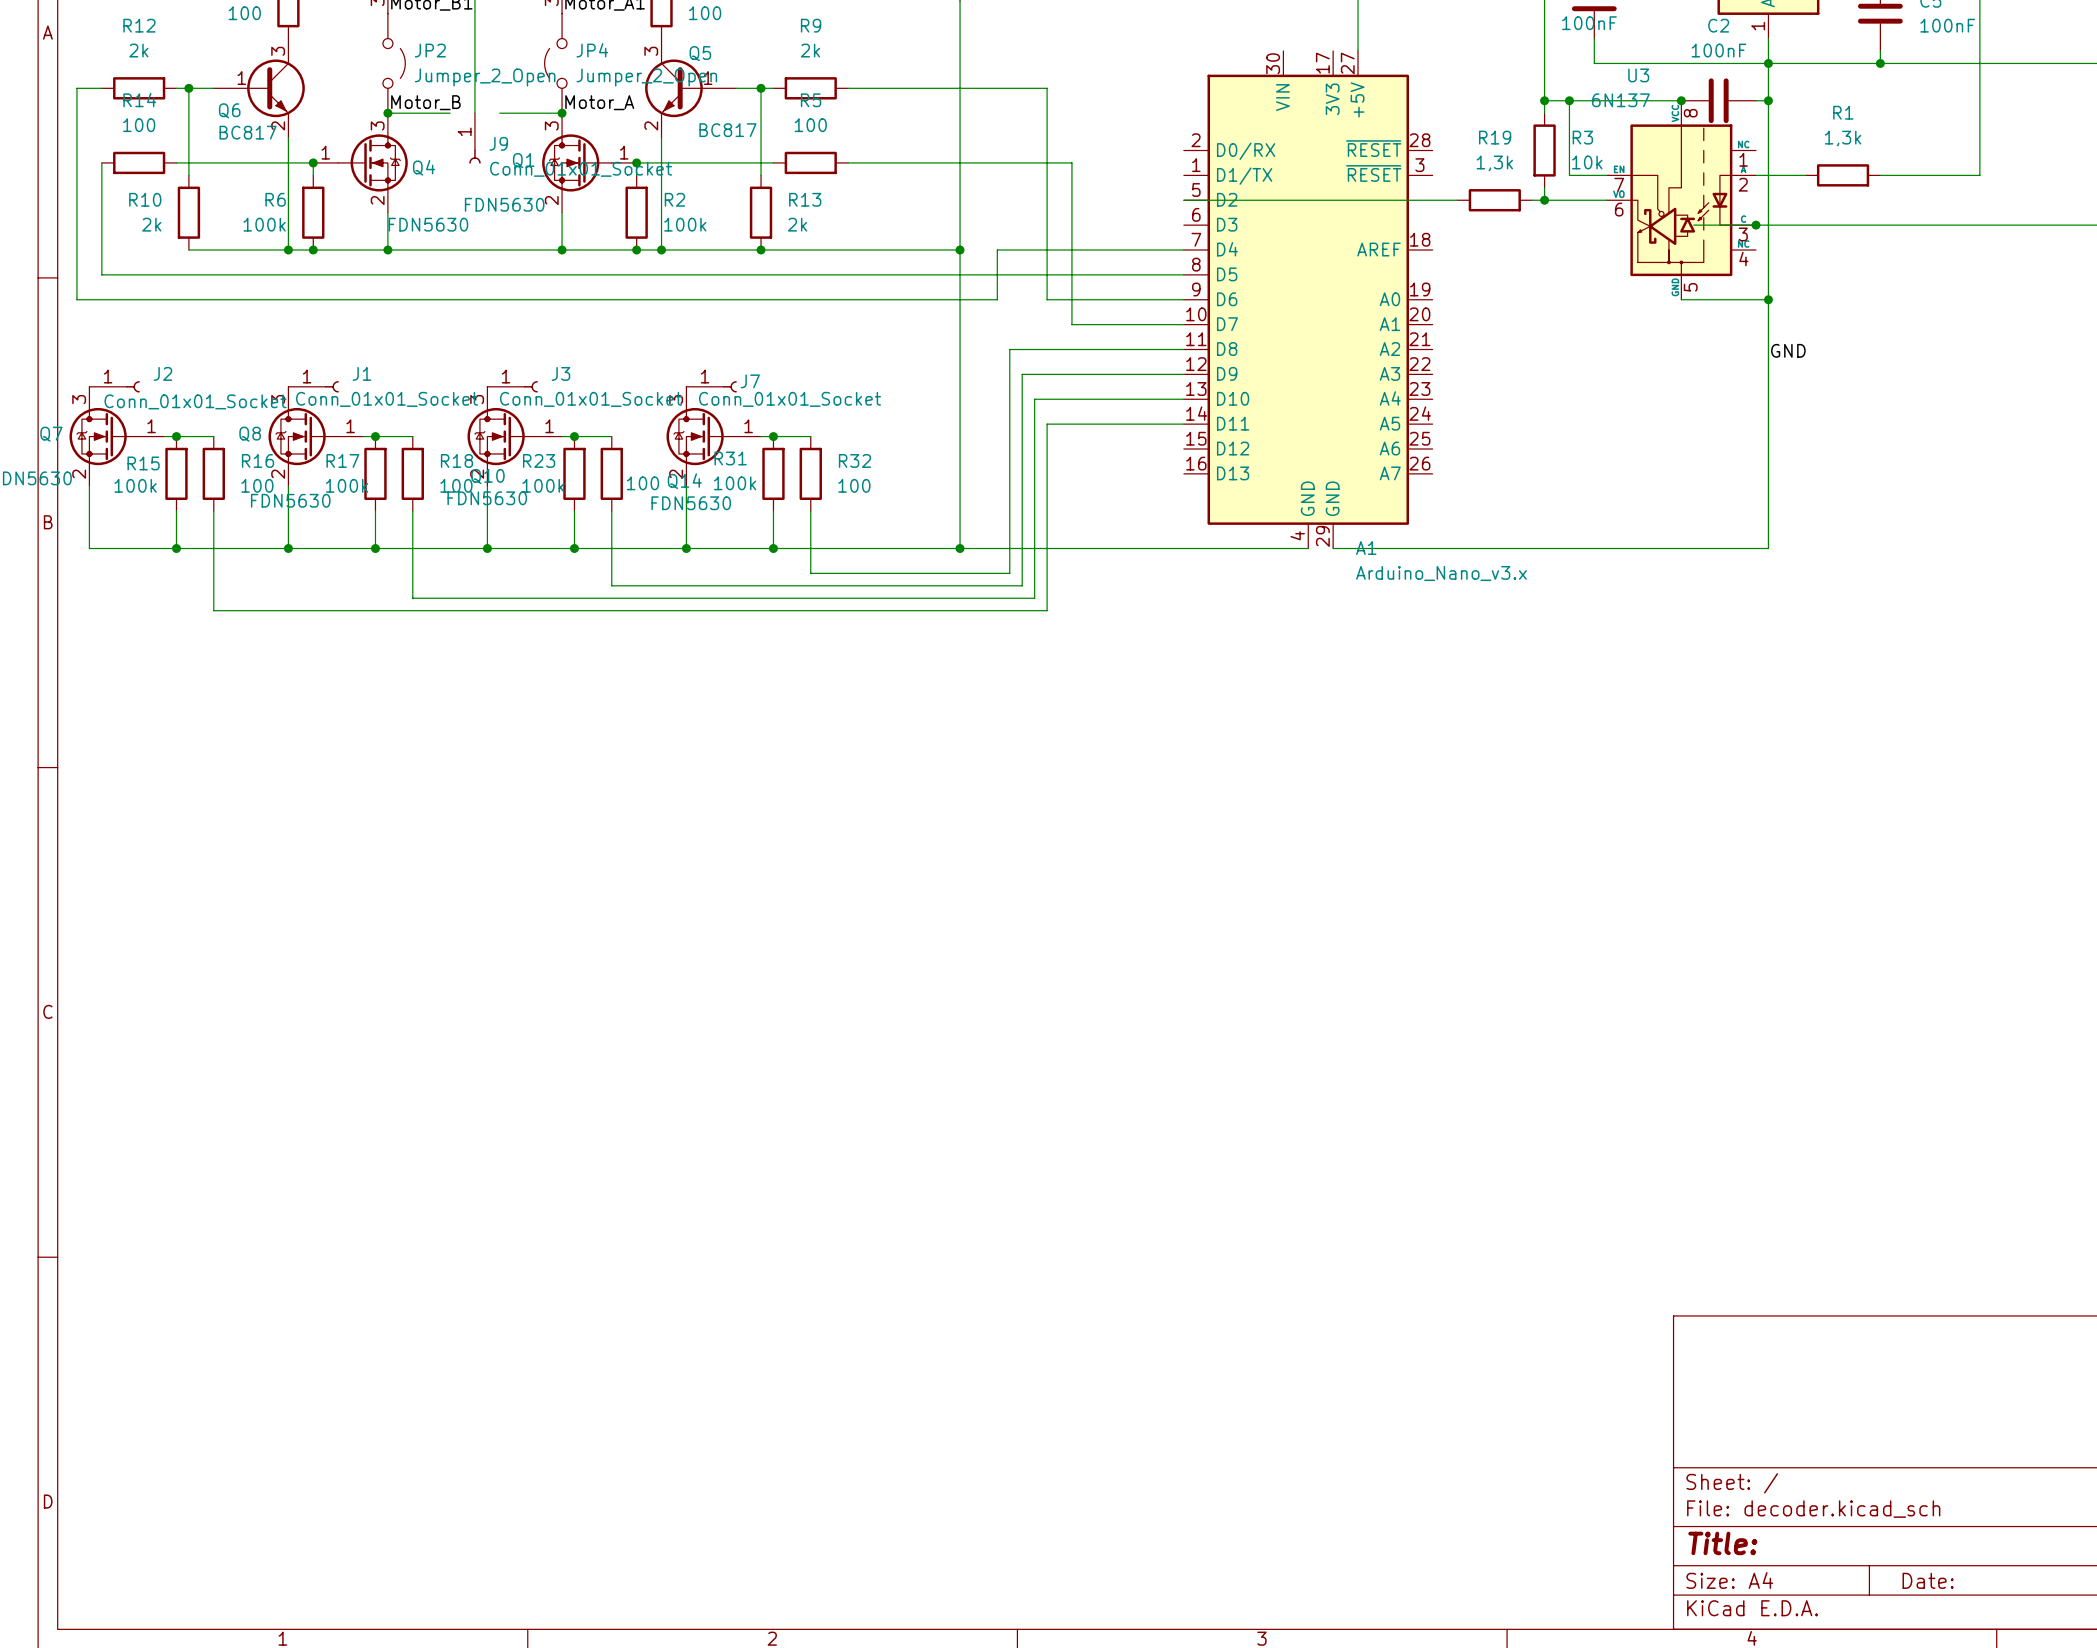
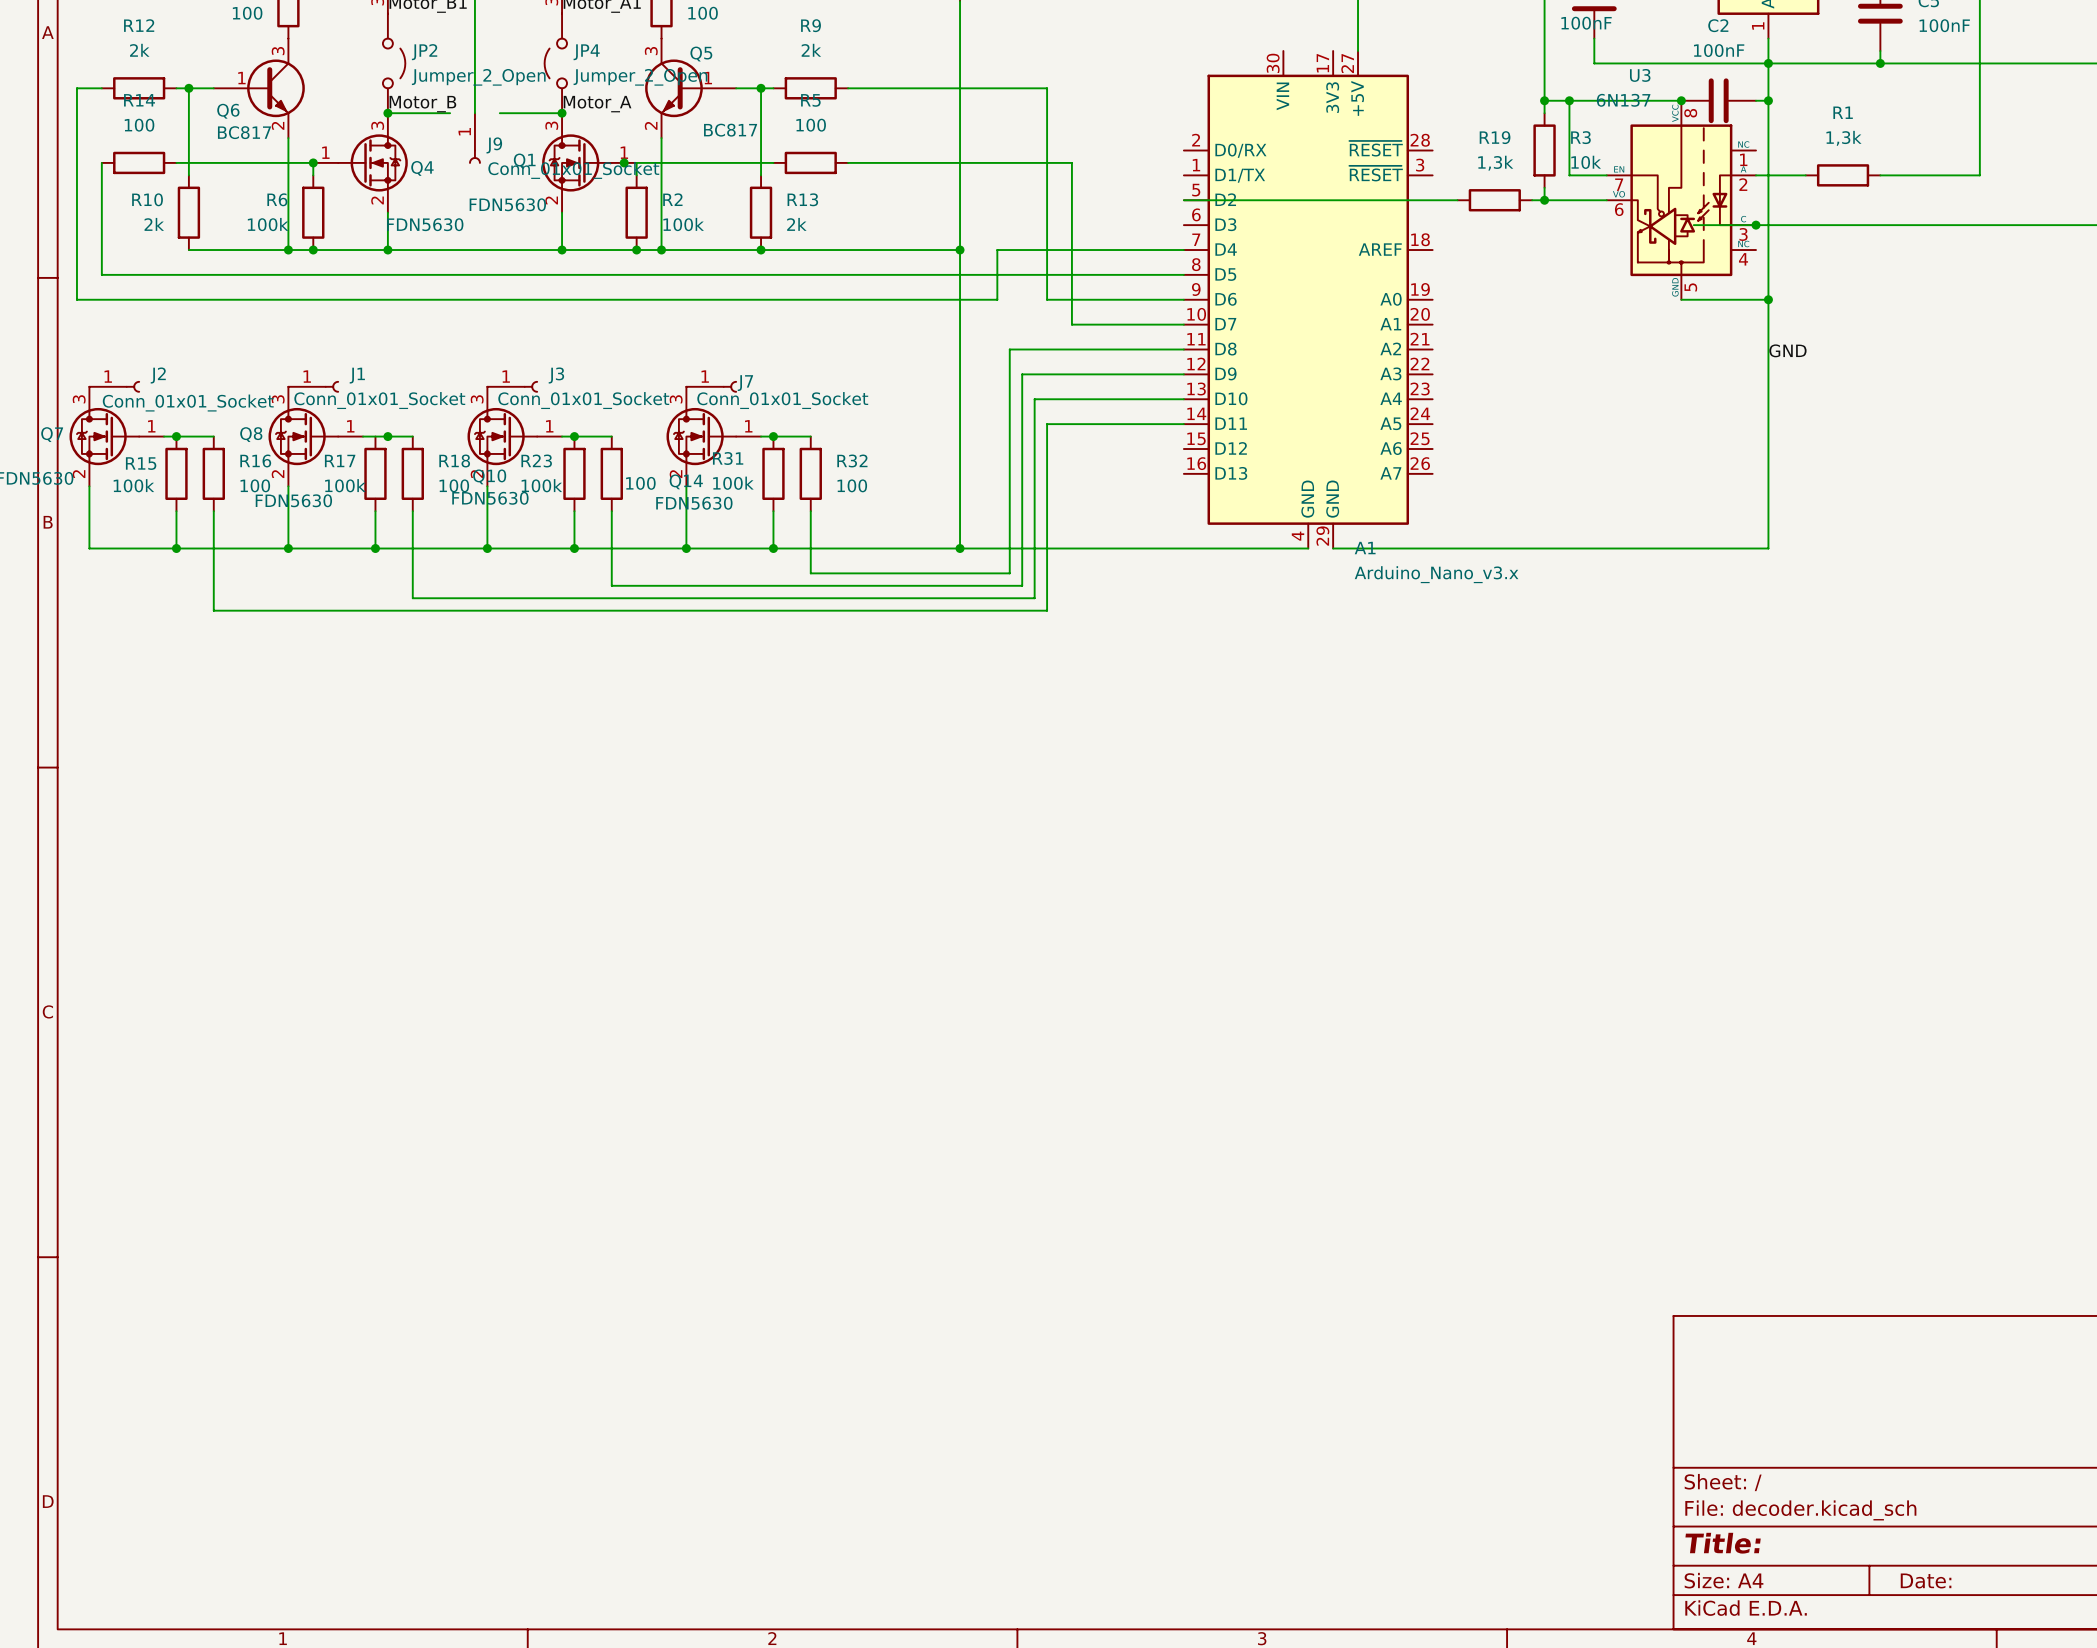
junction position: (636, 162) -> (624, 162)
junction position: (375, 436) -> (387, 436)

